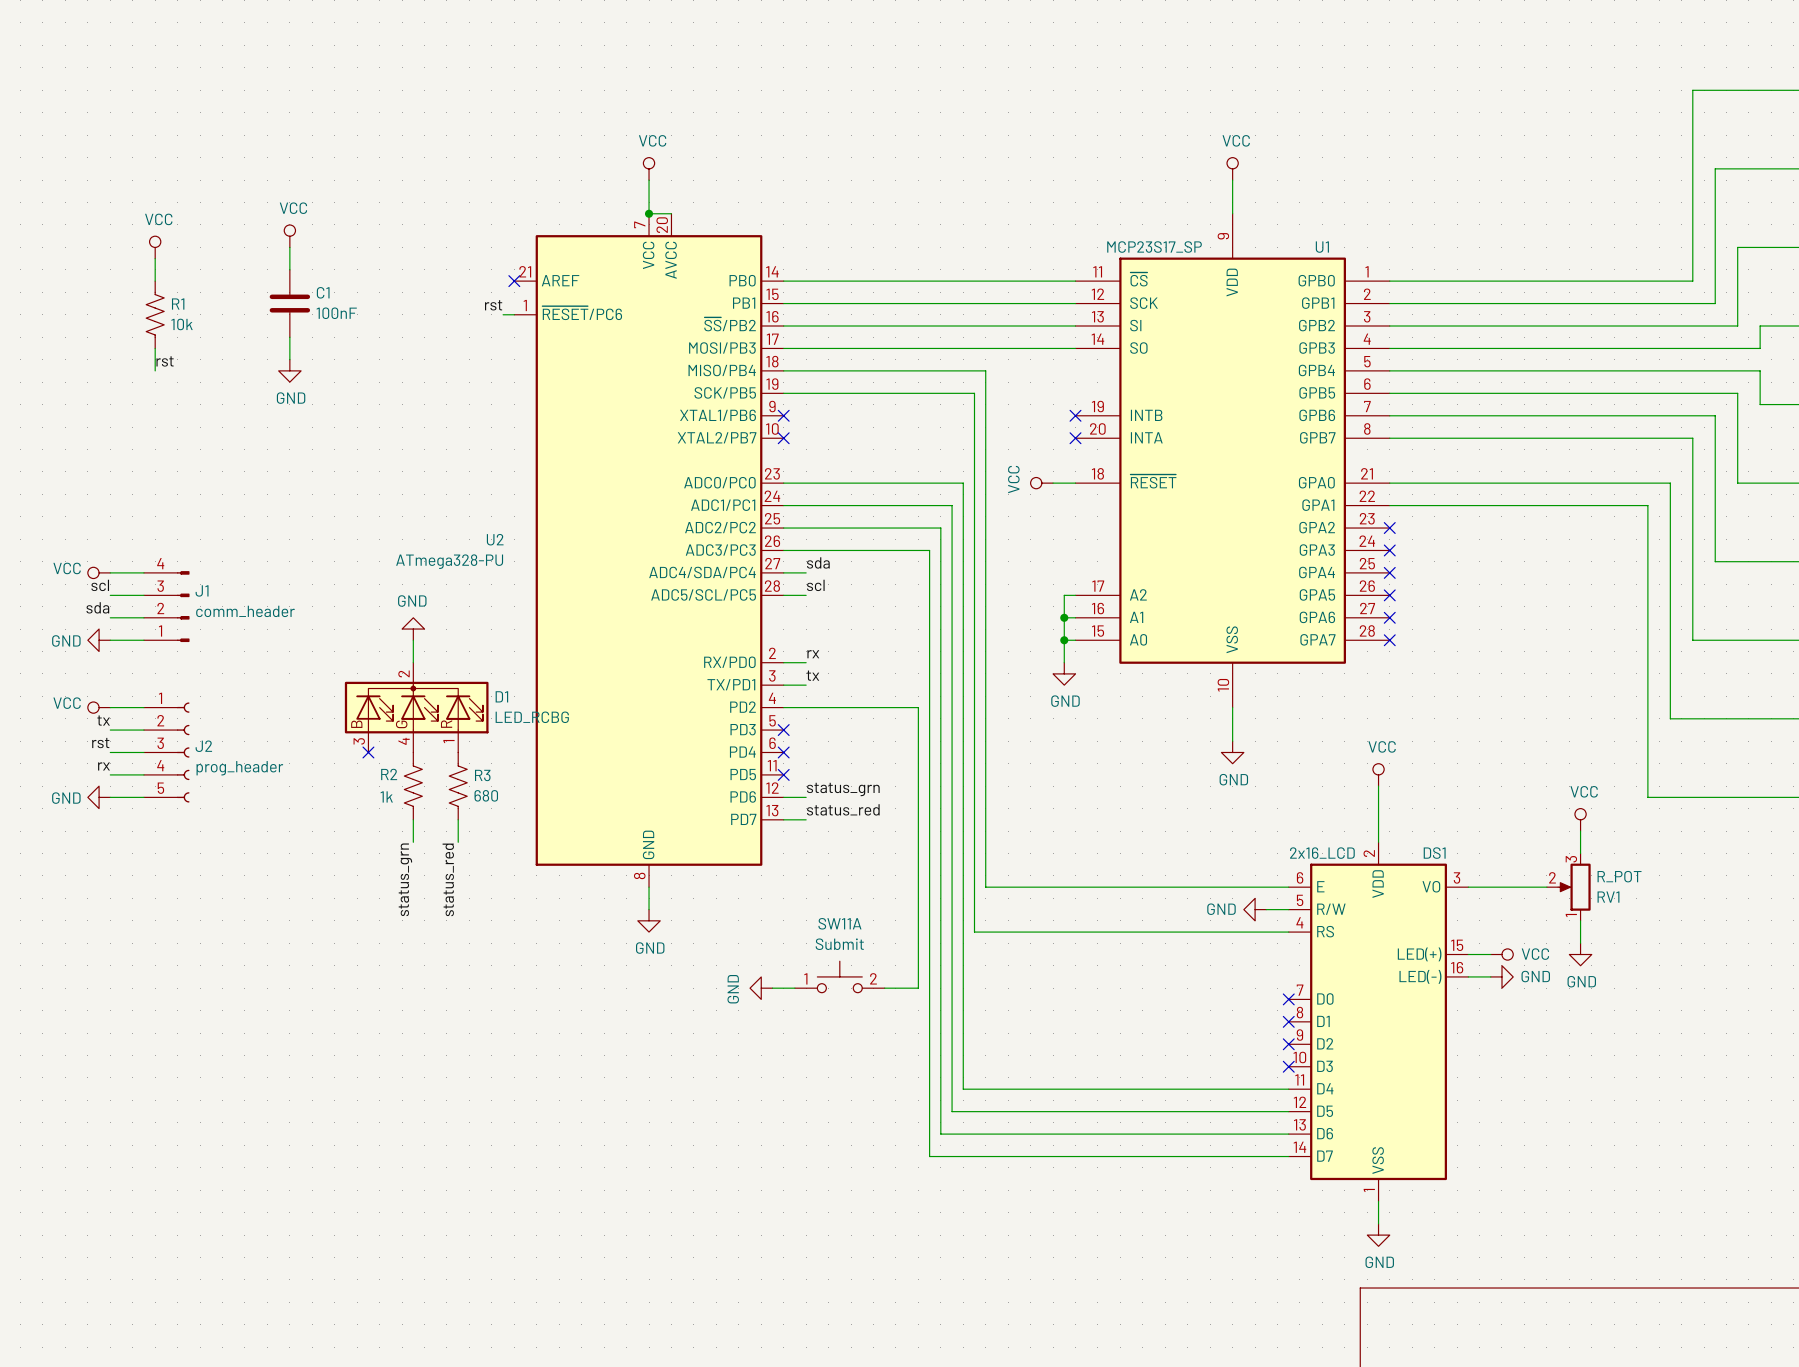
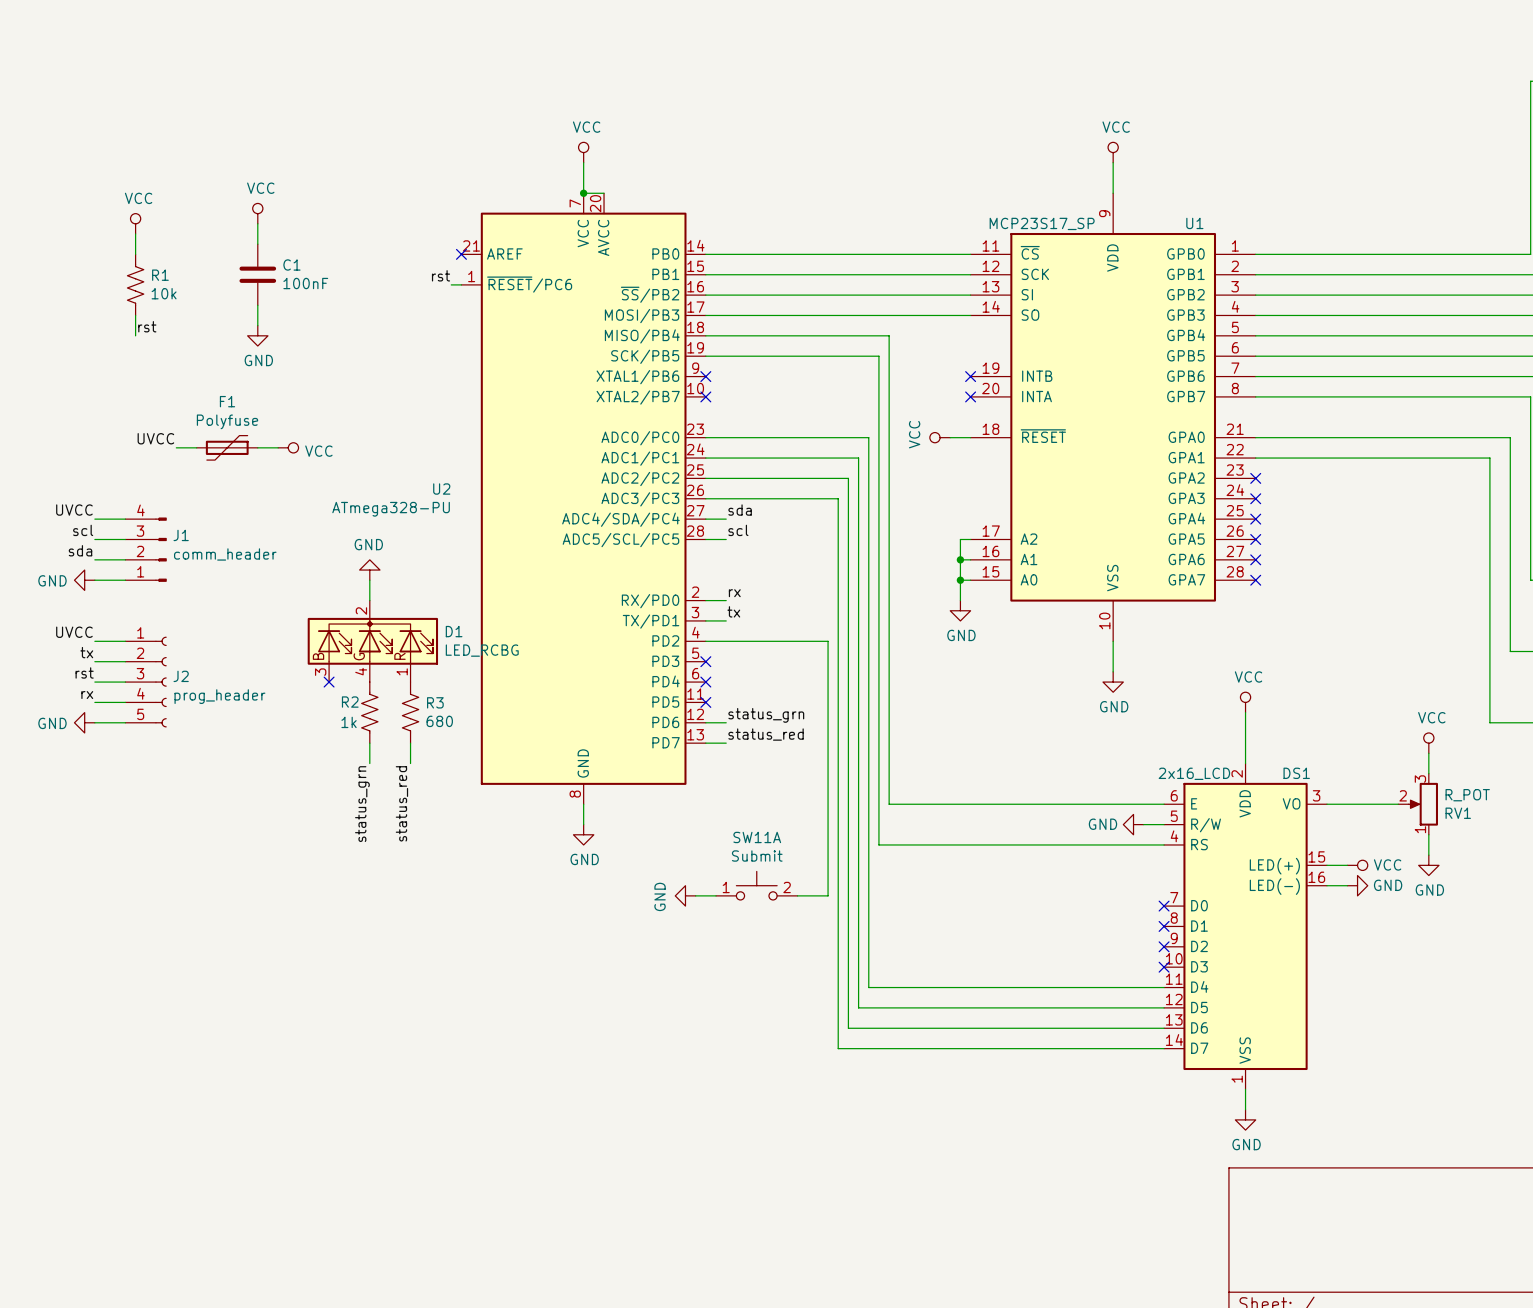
label: none -> UVCC (155, 438)
wire: none -> (176, 447) (196, 447)
F1: none -> Polyfuse (227, 447)
wire: none -> (257, 447) (278, 447)
power symbol: none -> VCC (288, 447)
label: none -> UVCC (74, 510)
power symbol: VCC (99, 572) -> none
label: none -> UVCC (74, 632)
power symbol: VCC (99, 707) -> none

